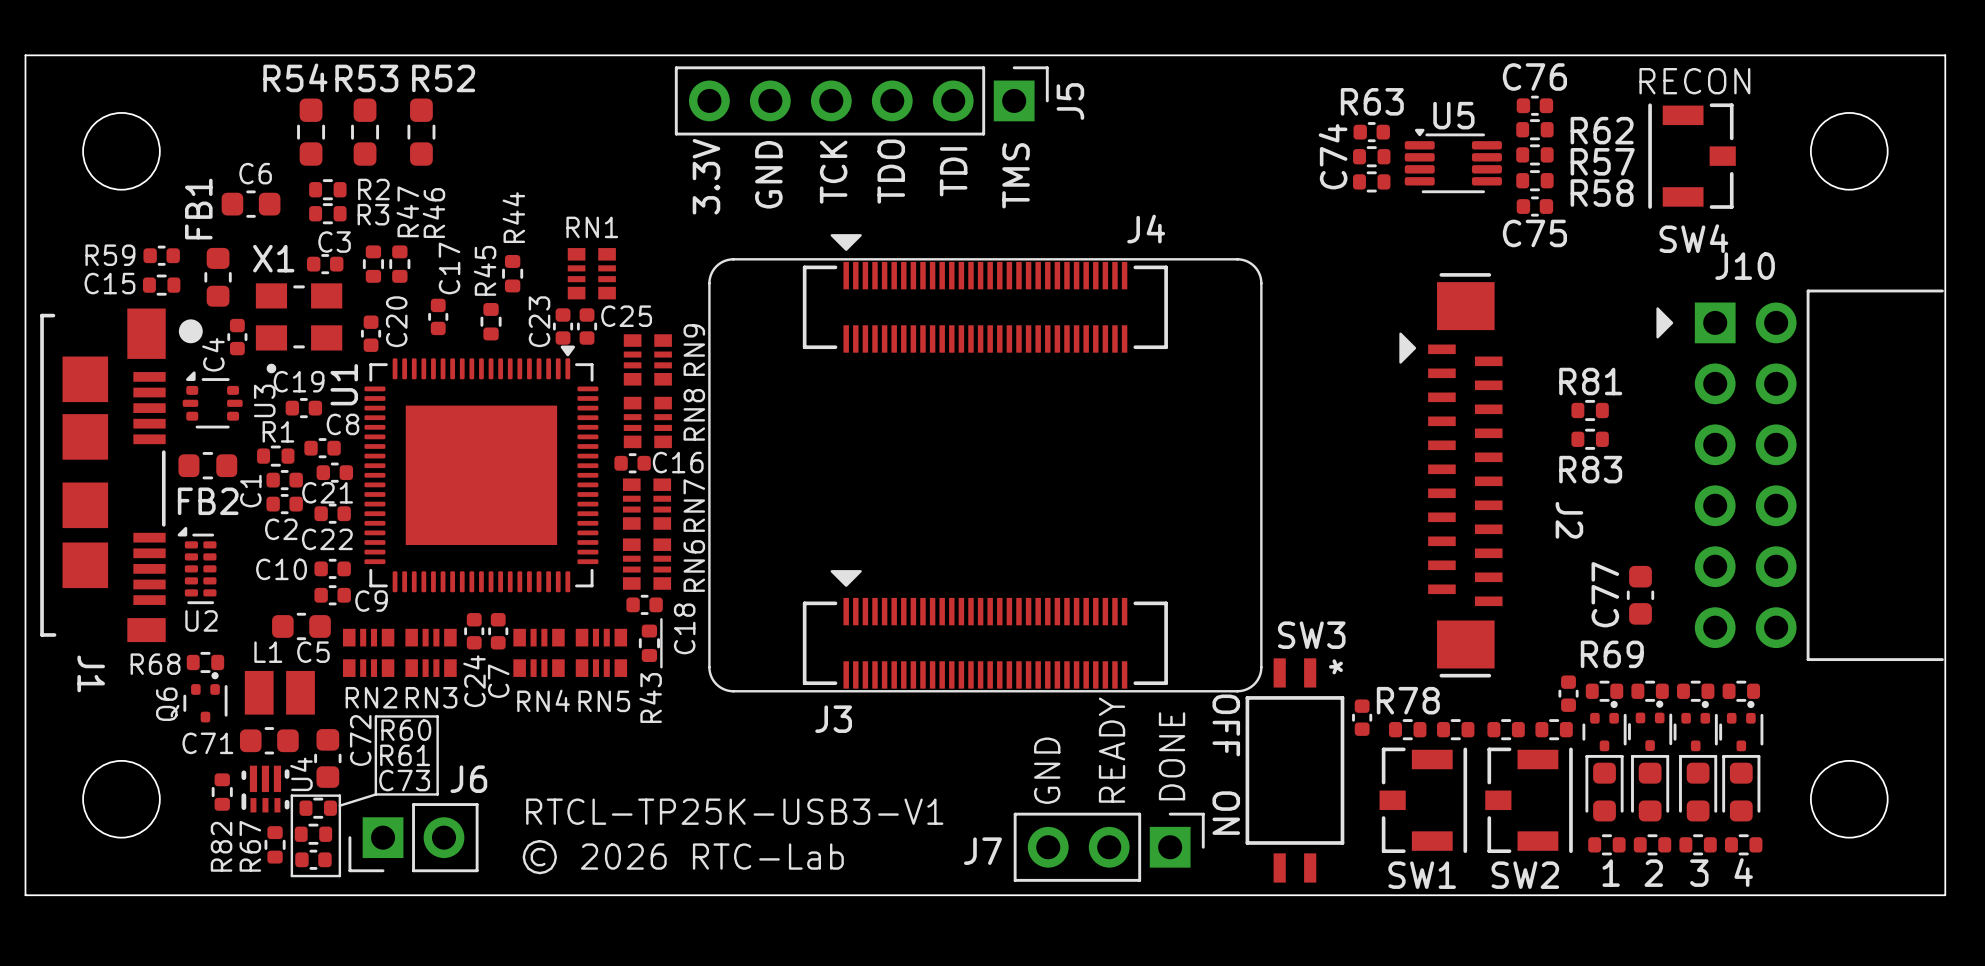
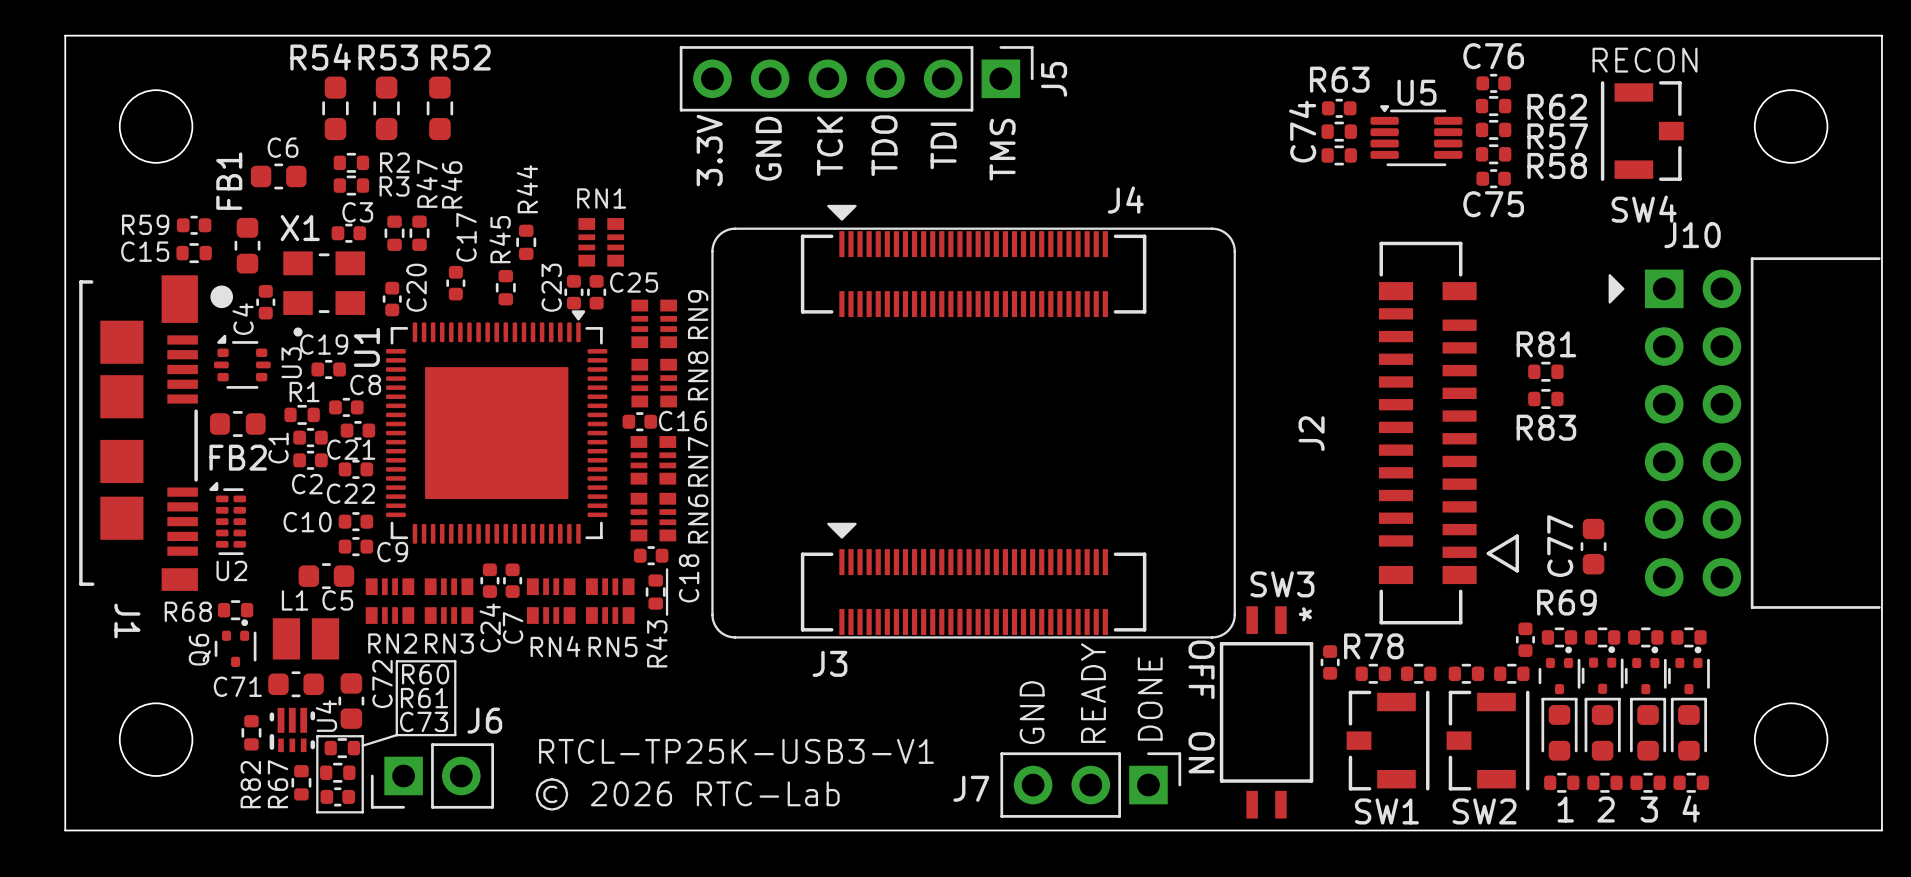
J2 footprint: [1399, 273, 1503, 678] -> [1378, 241, 1519, 625]
J2 name position: J2 (1569, 520) -> J2 (1311, 433)

